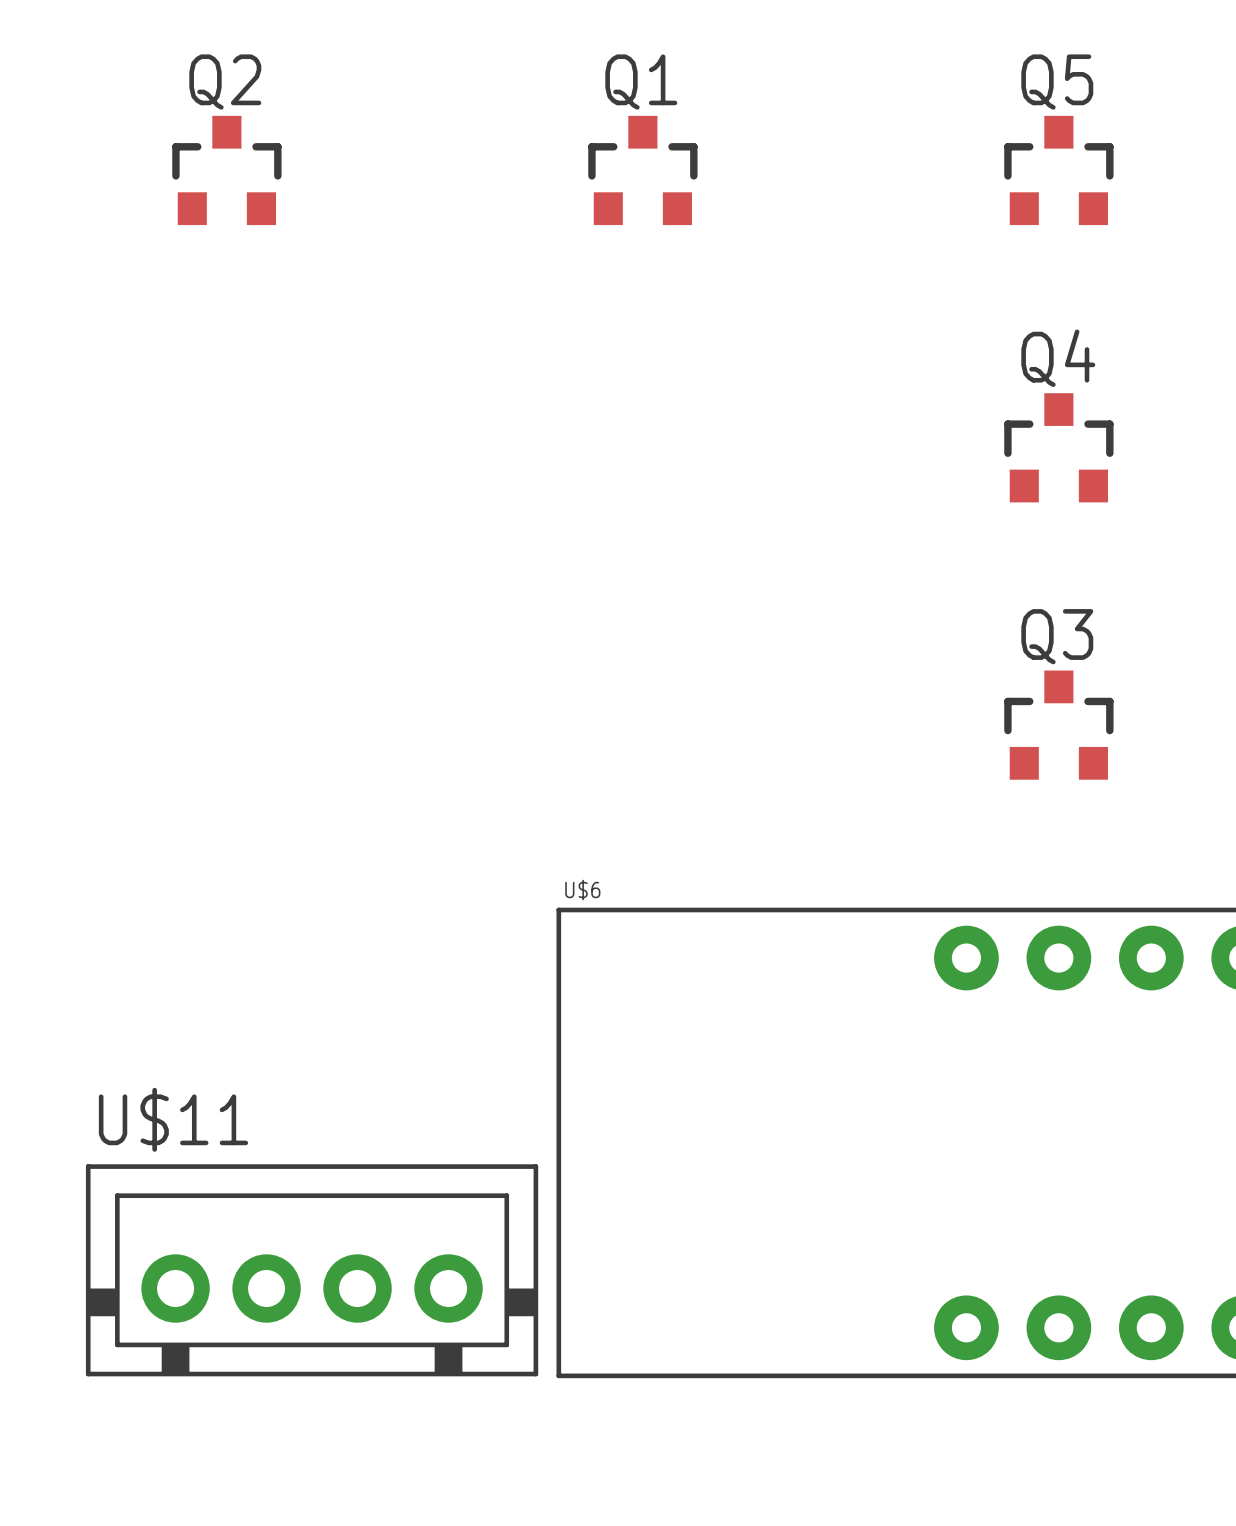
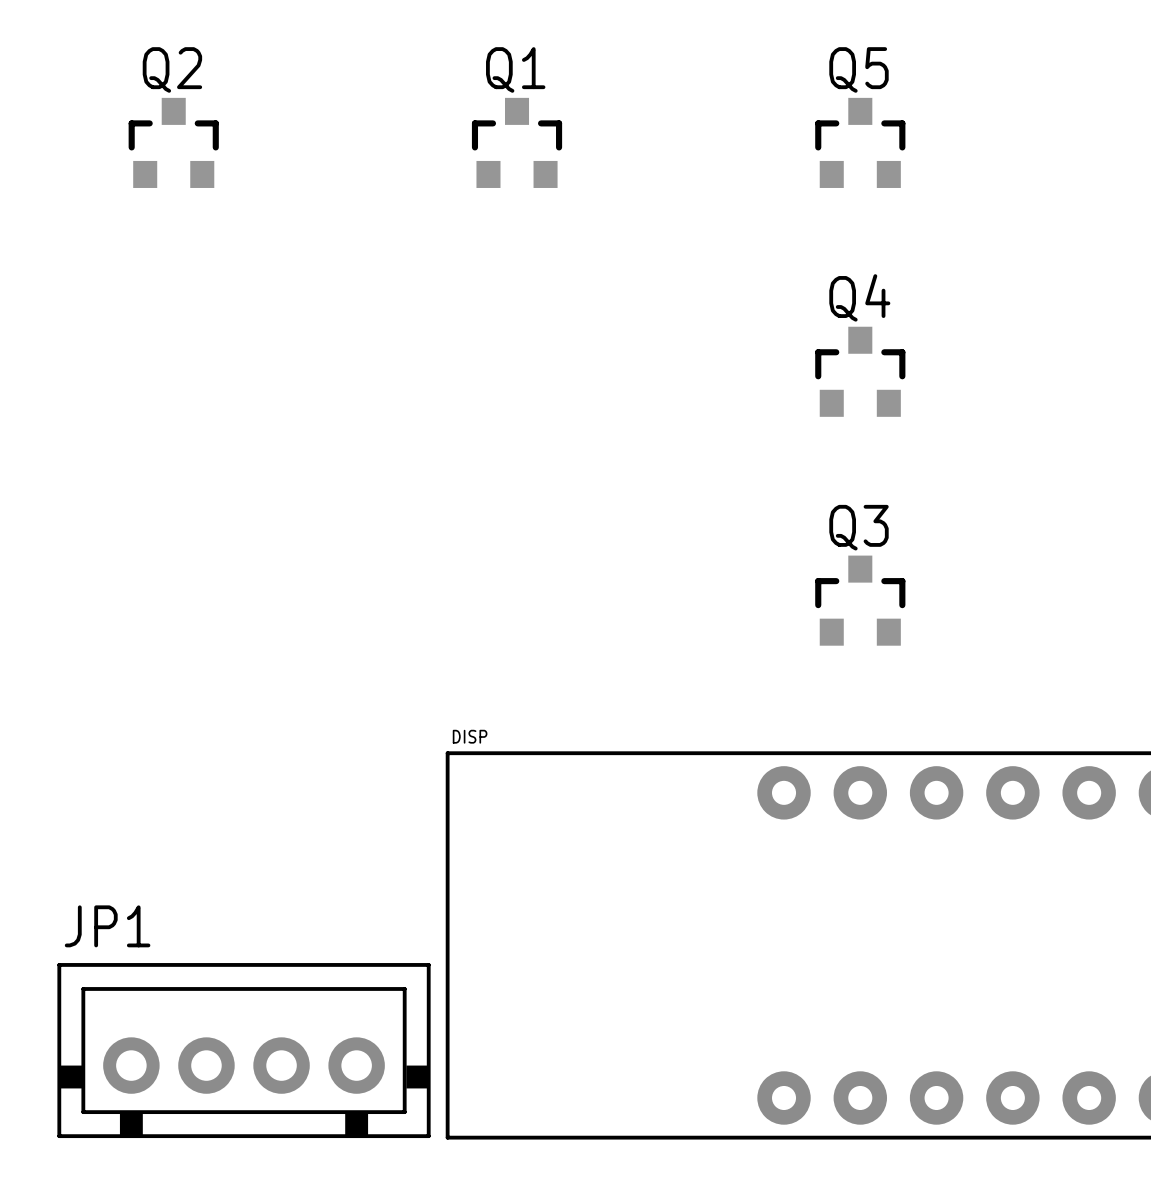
U$6 name: U$6 (582, 890) -> DISP (470, 736)
U$11 name: U$11 (173, 1119) -> JP1 (107, 926)

